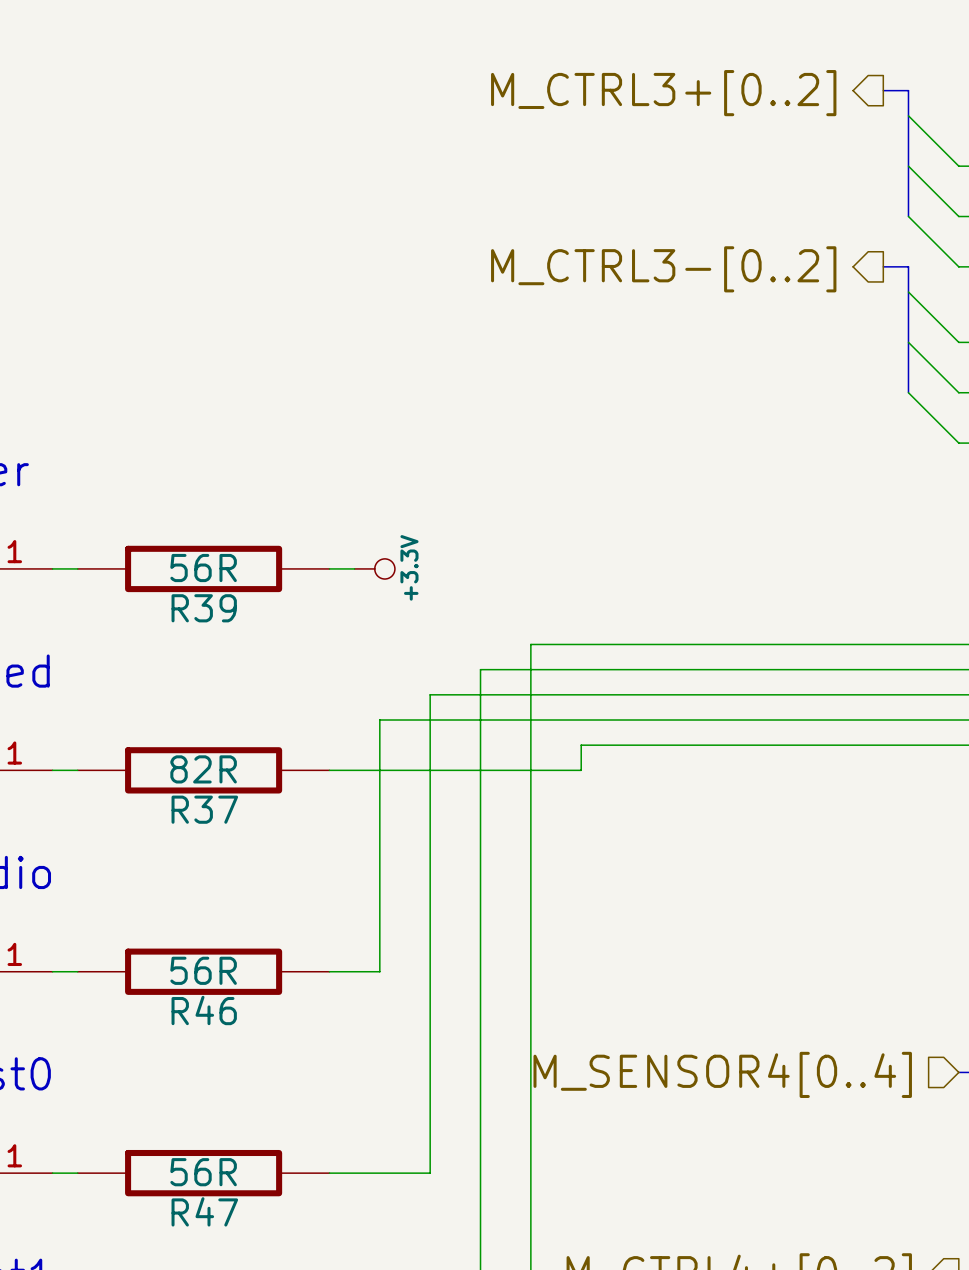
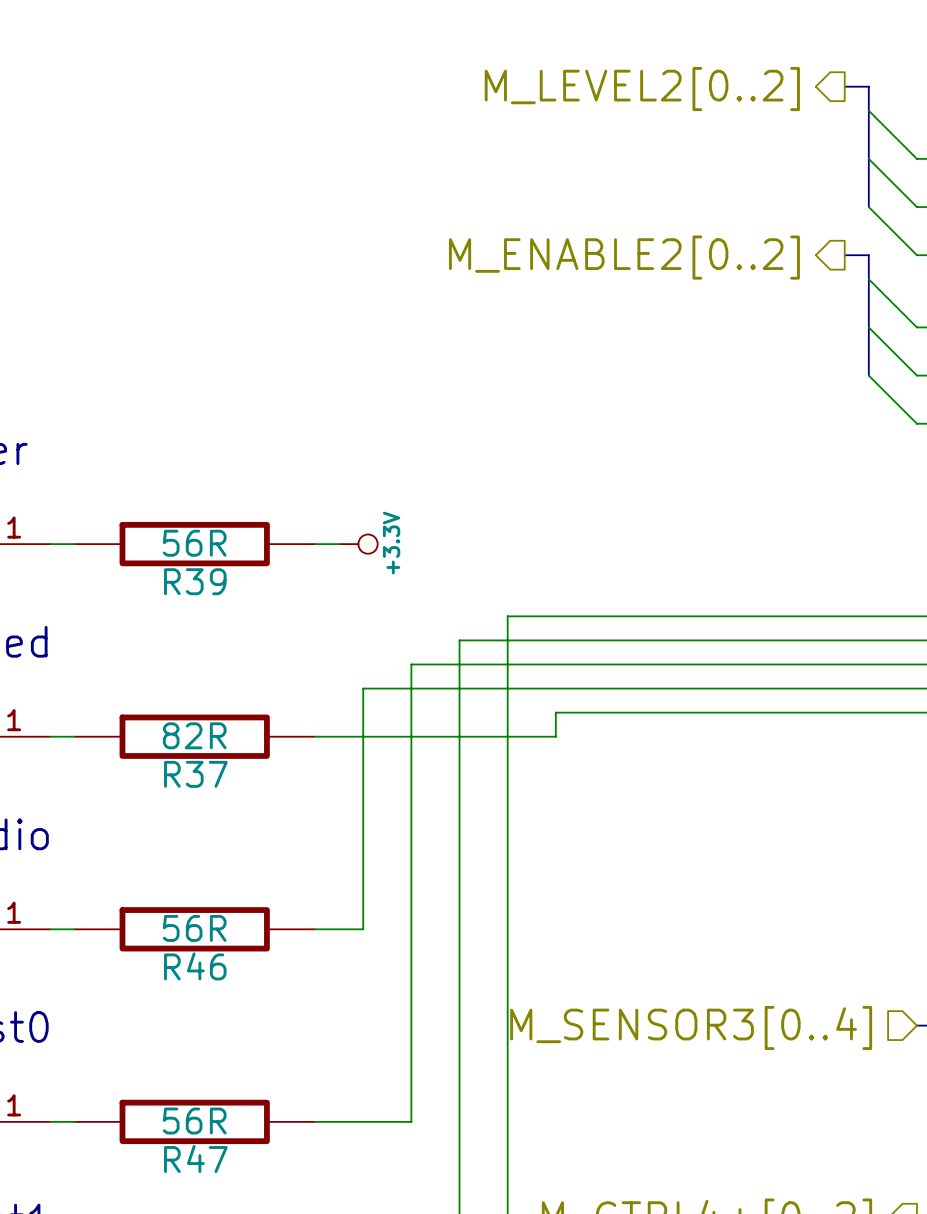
hierarchical label: M_CTRL3+[0..2] (663, 93) -> M_LEVEL2[0..2] (642, 89)
hierarchical label: M_CTRL3-[0..2] (663, 269) -> M_ENABLE2[0..2] (624, 257)
hierarchical label: M_SENSOR4[0..4] (722, 1074) -> M_SENSOR3[0..4] (691, 1027)

